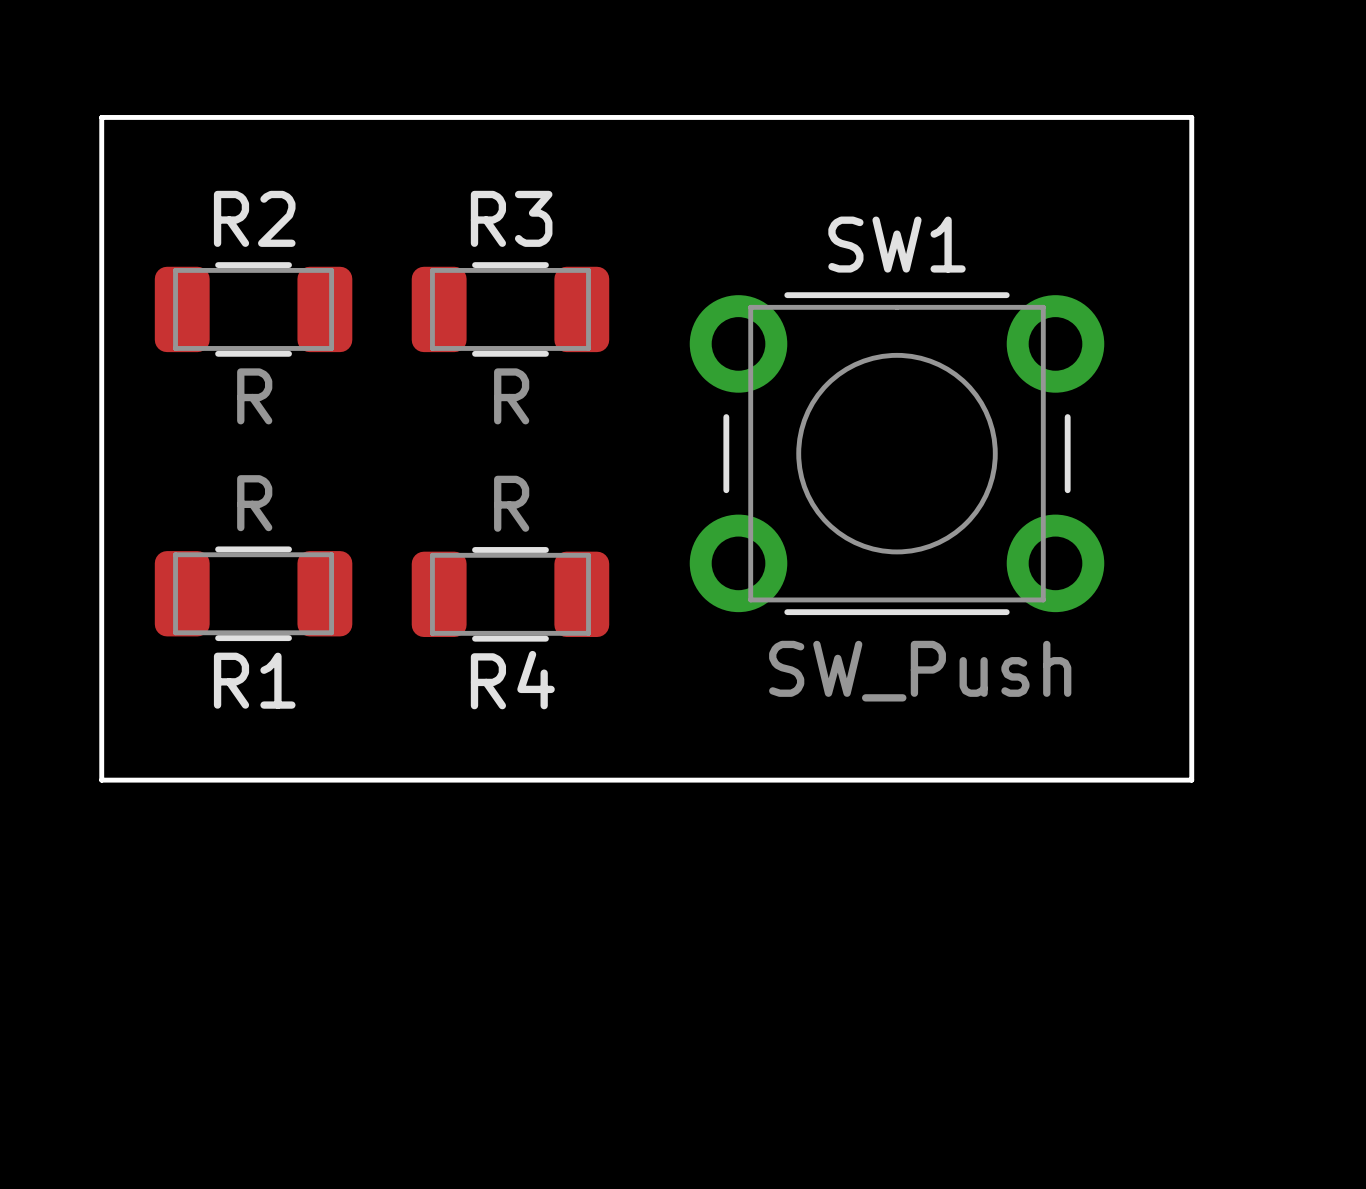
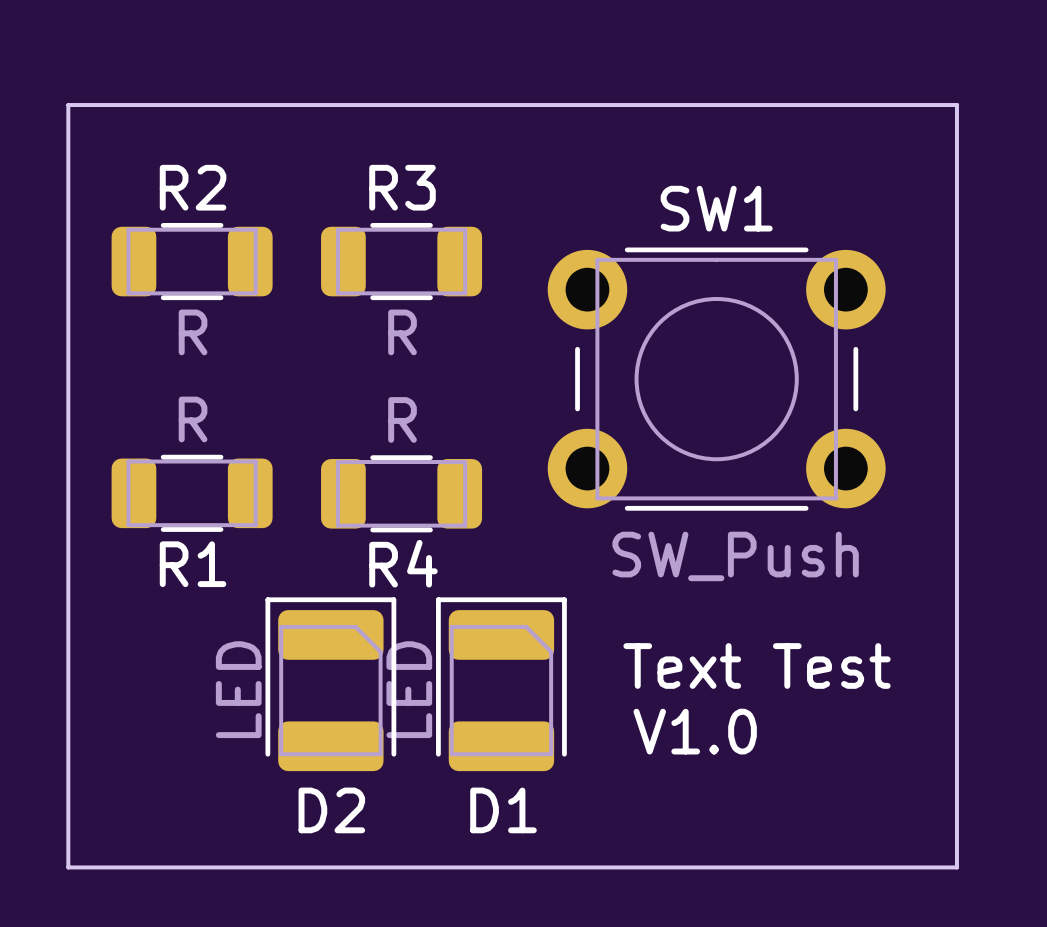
board edge: (101, 780) (1191, 780) -> (68, 645) (68, 867) (956, 867) (956, 645)
text: none -> Text Test (757, 665)
D2: none -> LED (330, 684)
D1: none -> LED (501, 684)
text: none -> V1.0 (695, 731)

